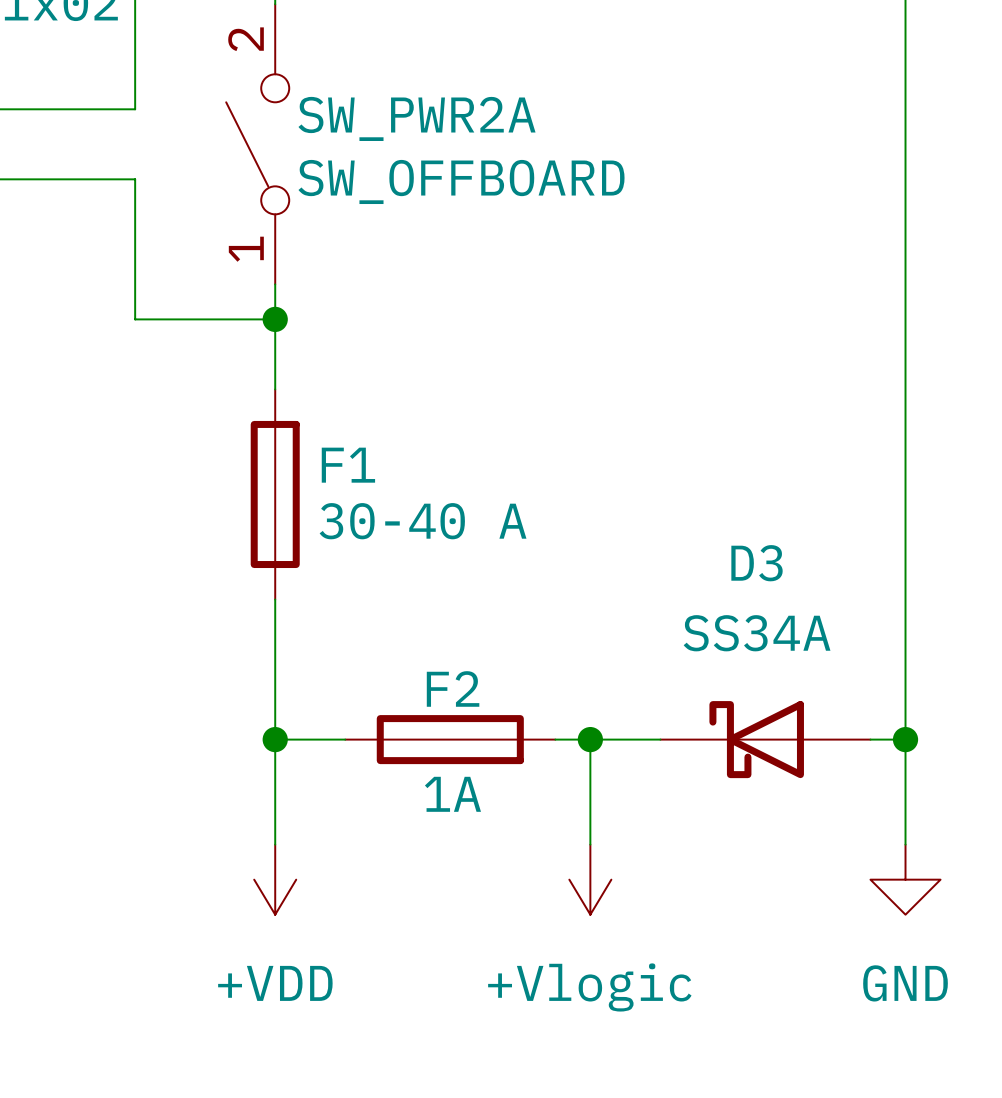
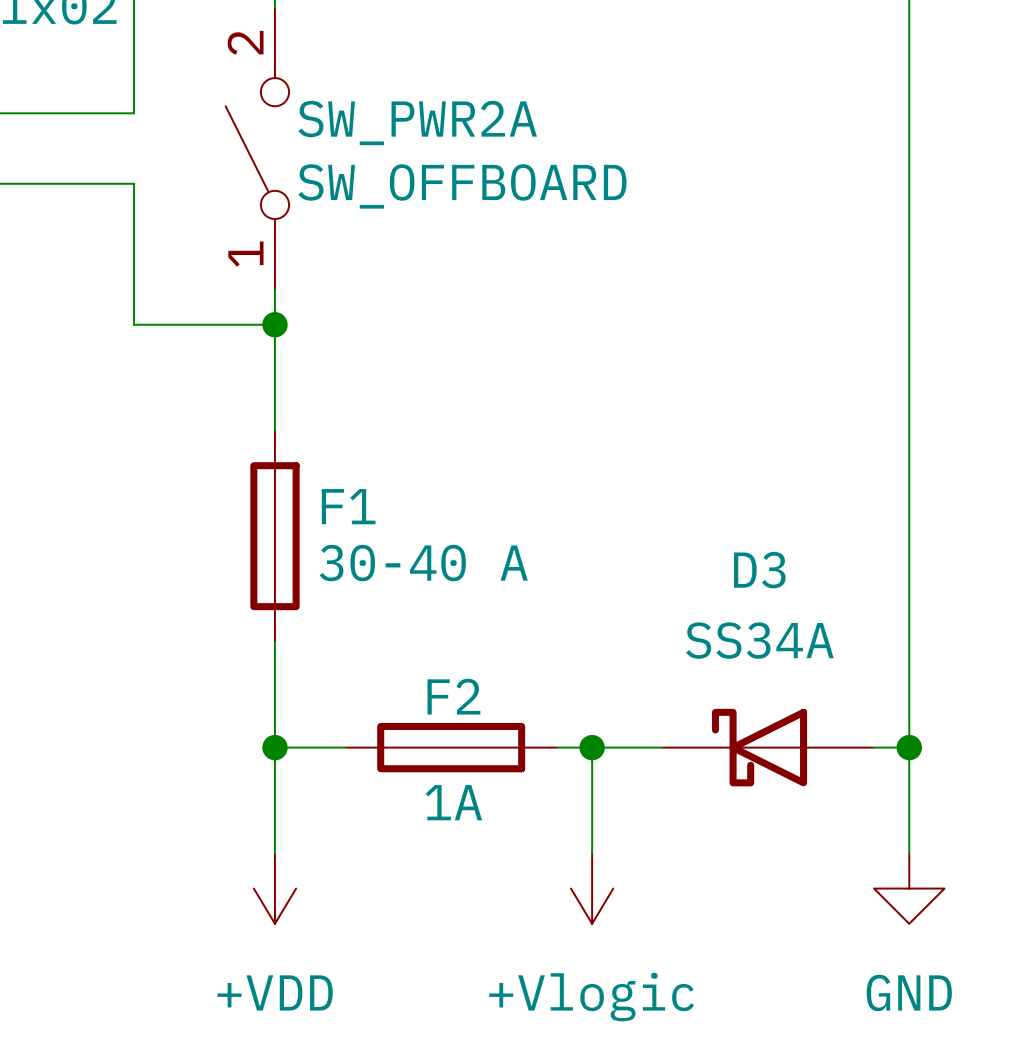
F1 position: (275, 494) -> (274, 536)

